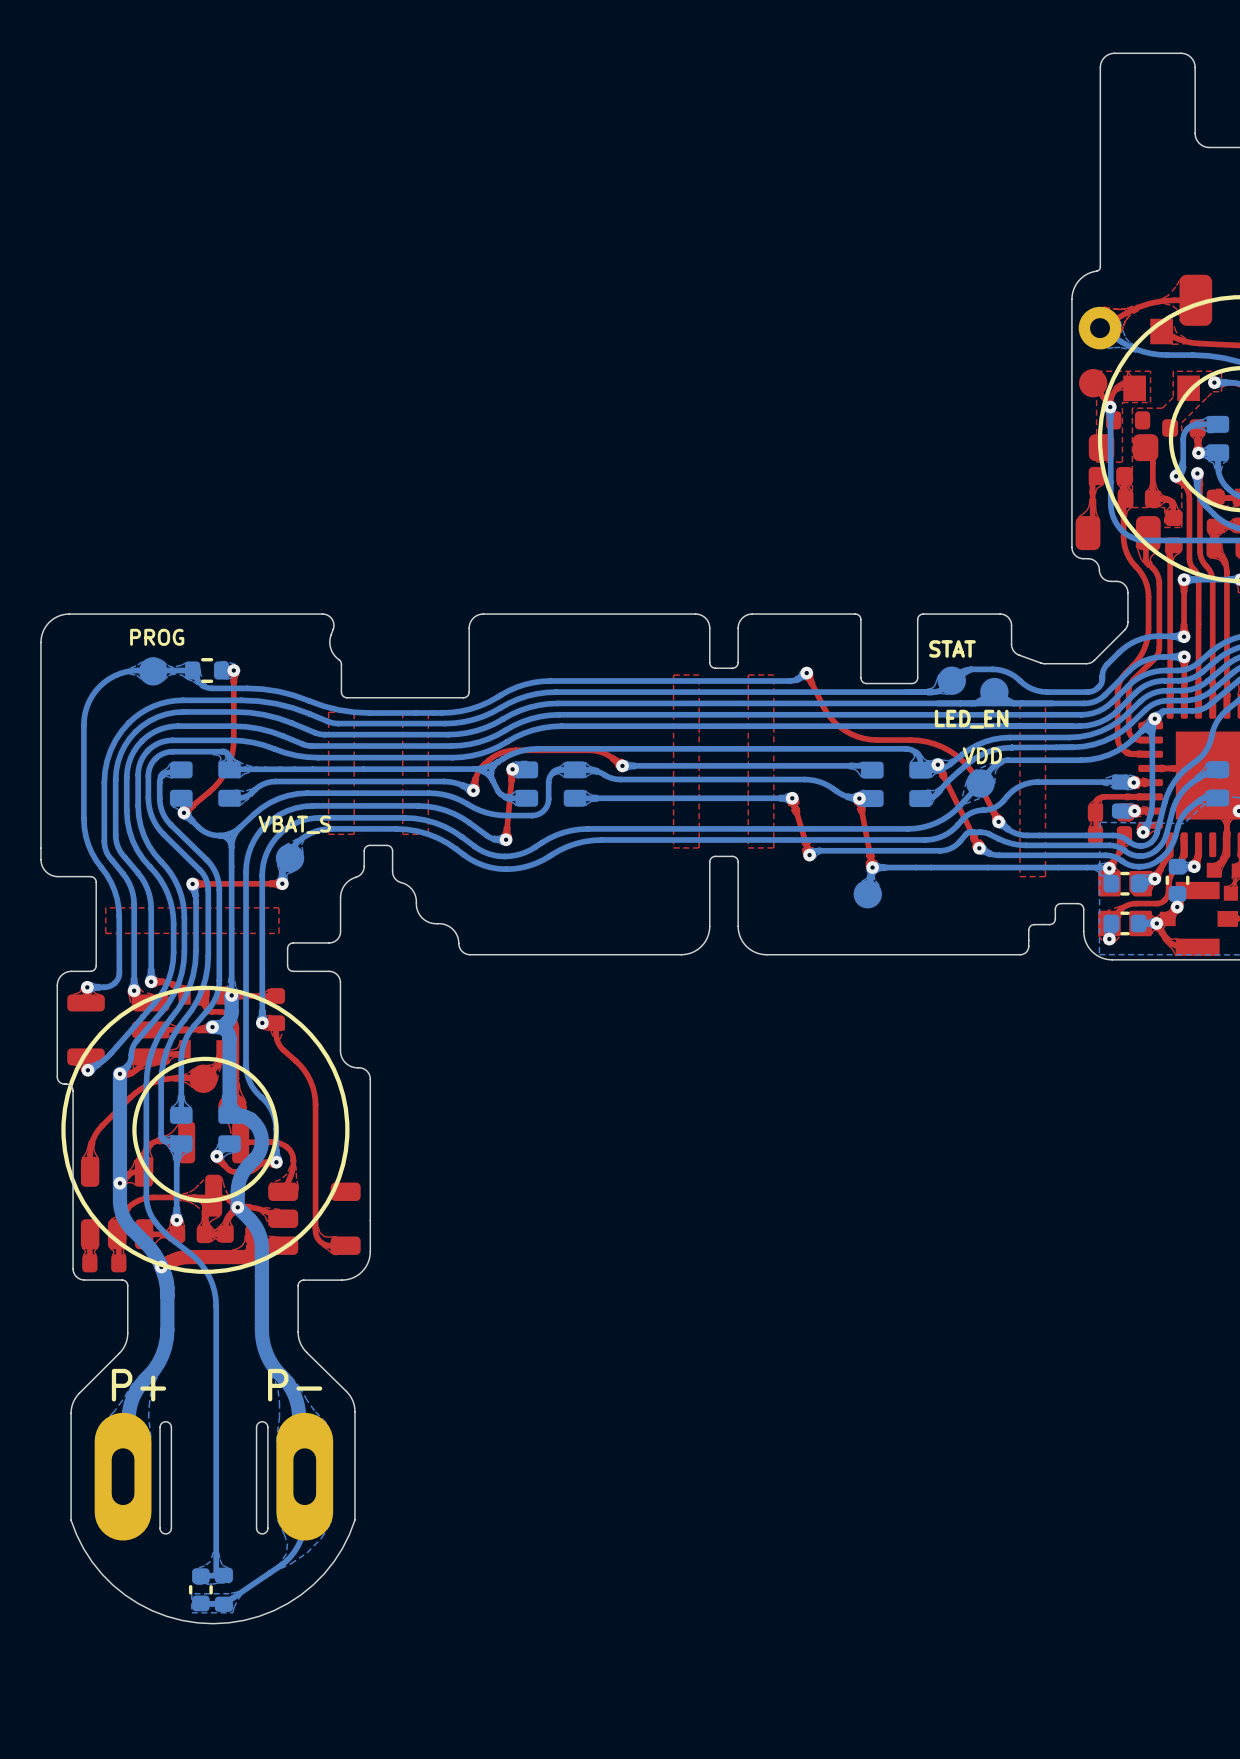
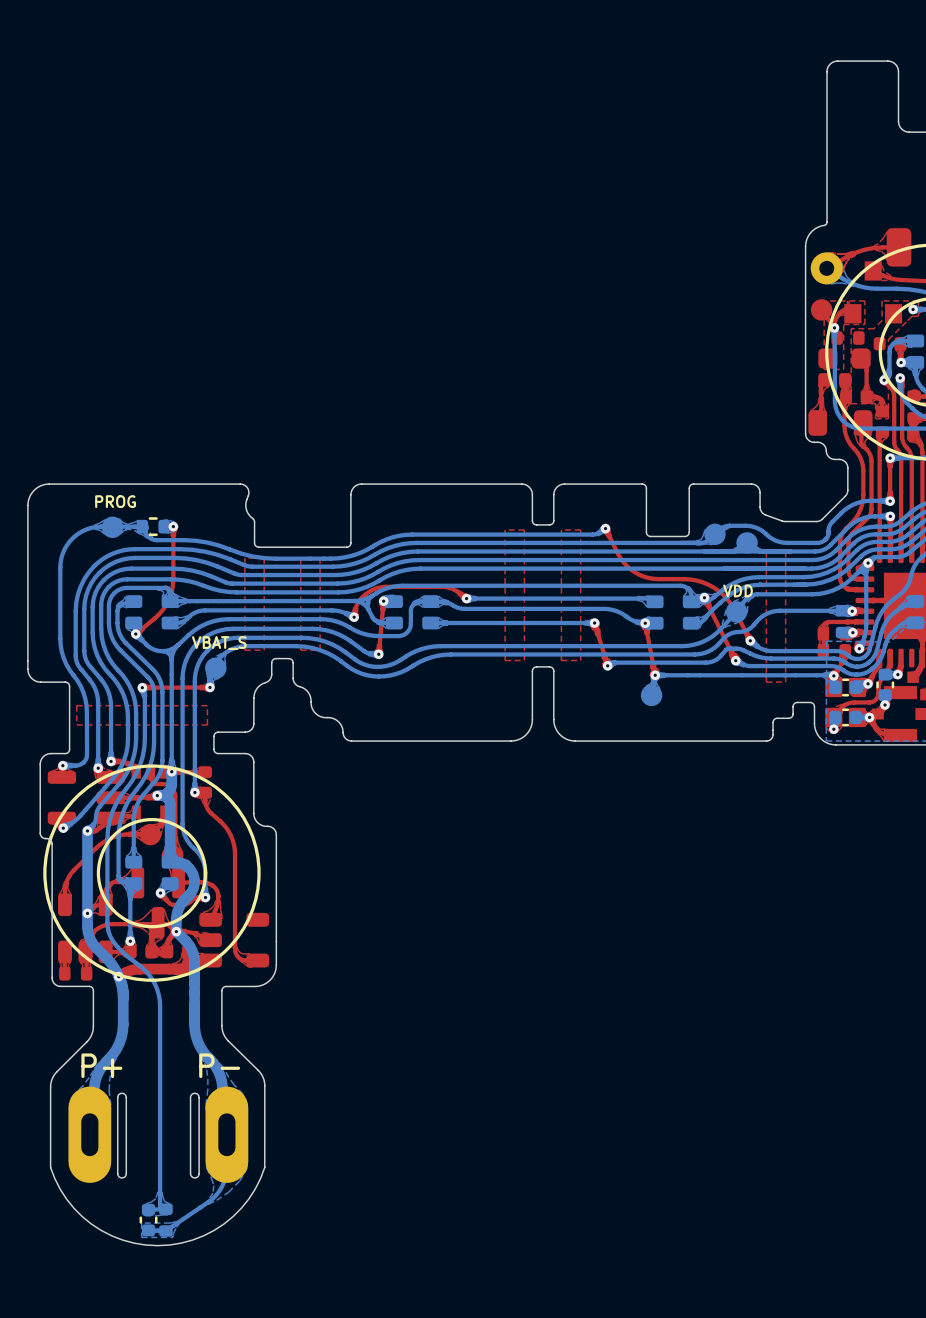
part value: STAT (952, 648) -> none
part value: LED_EN (971, 719) -> none

